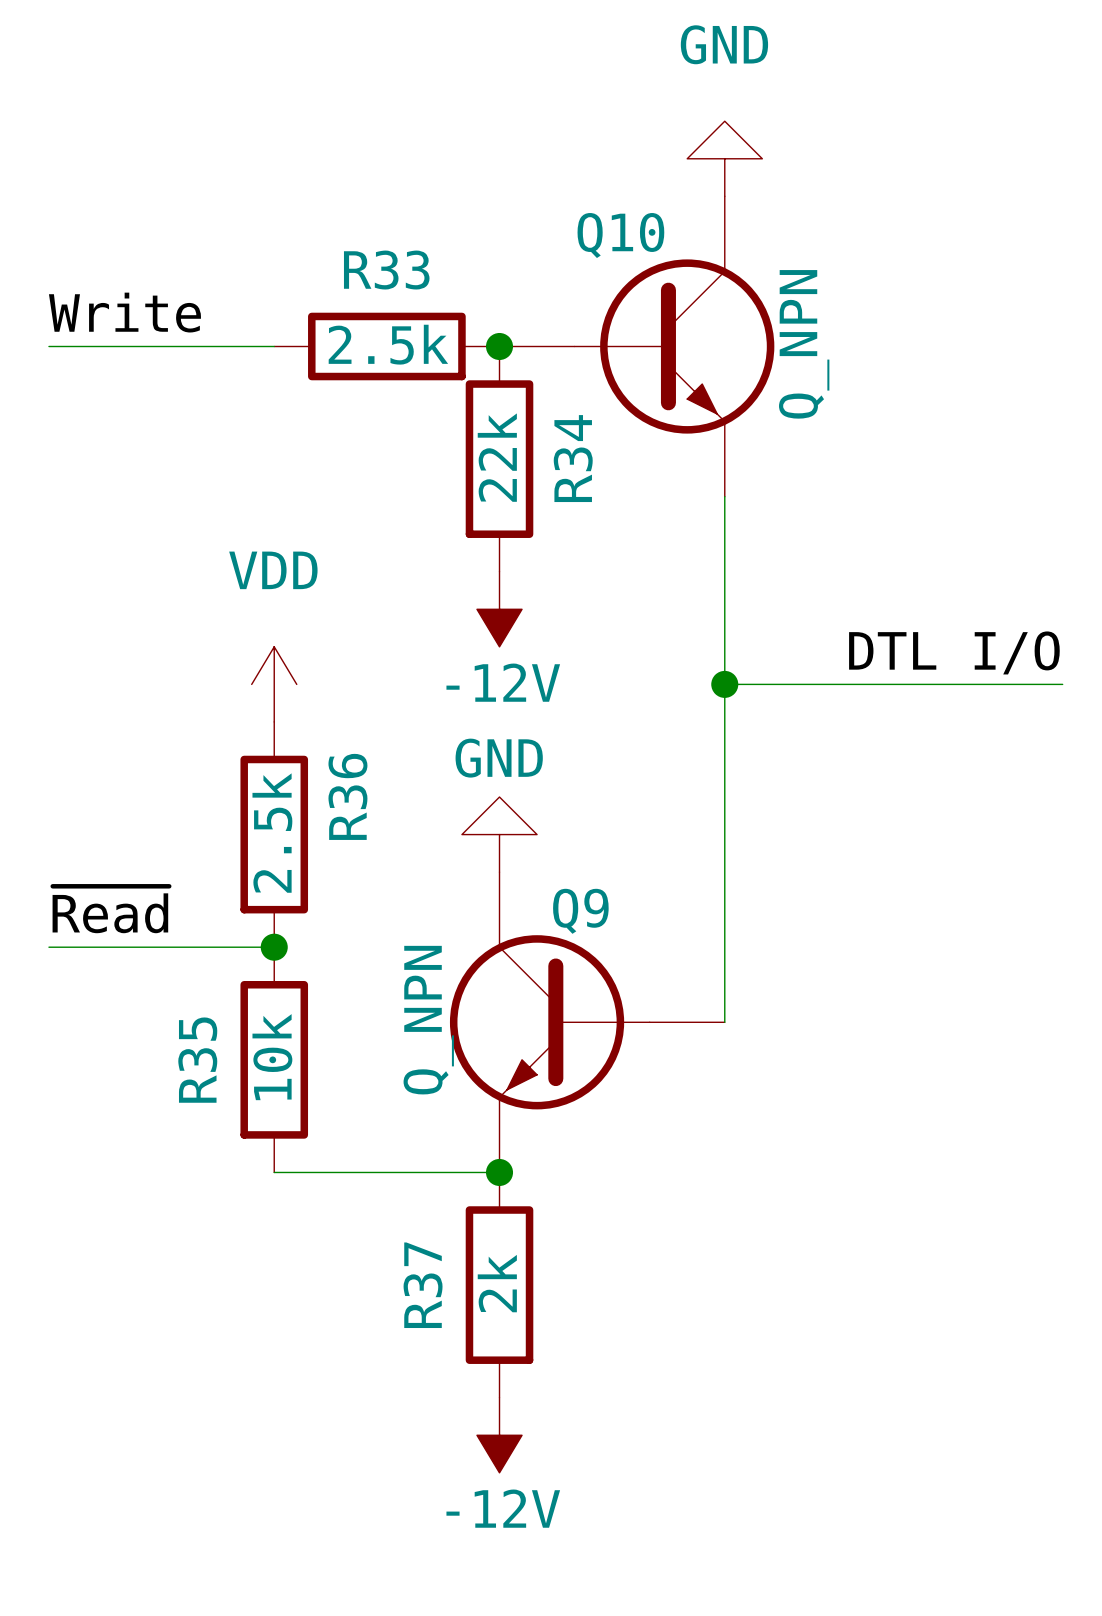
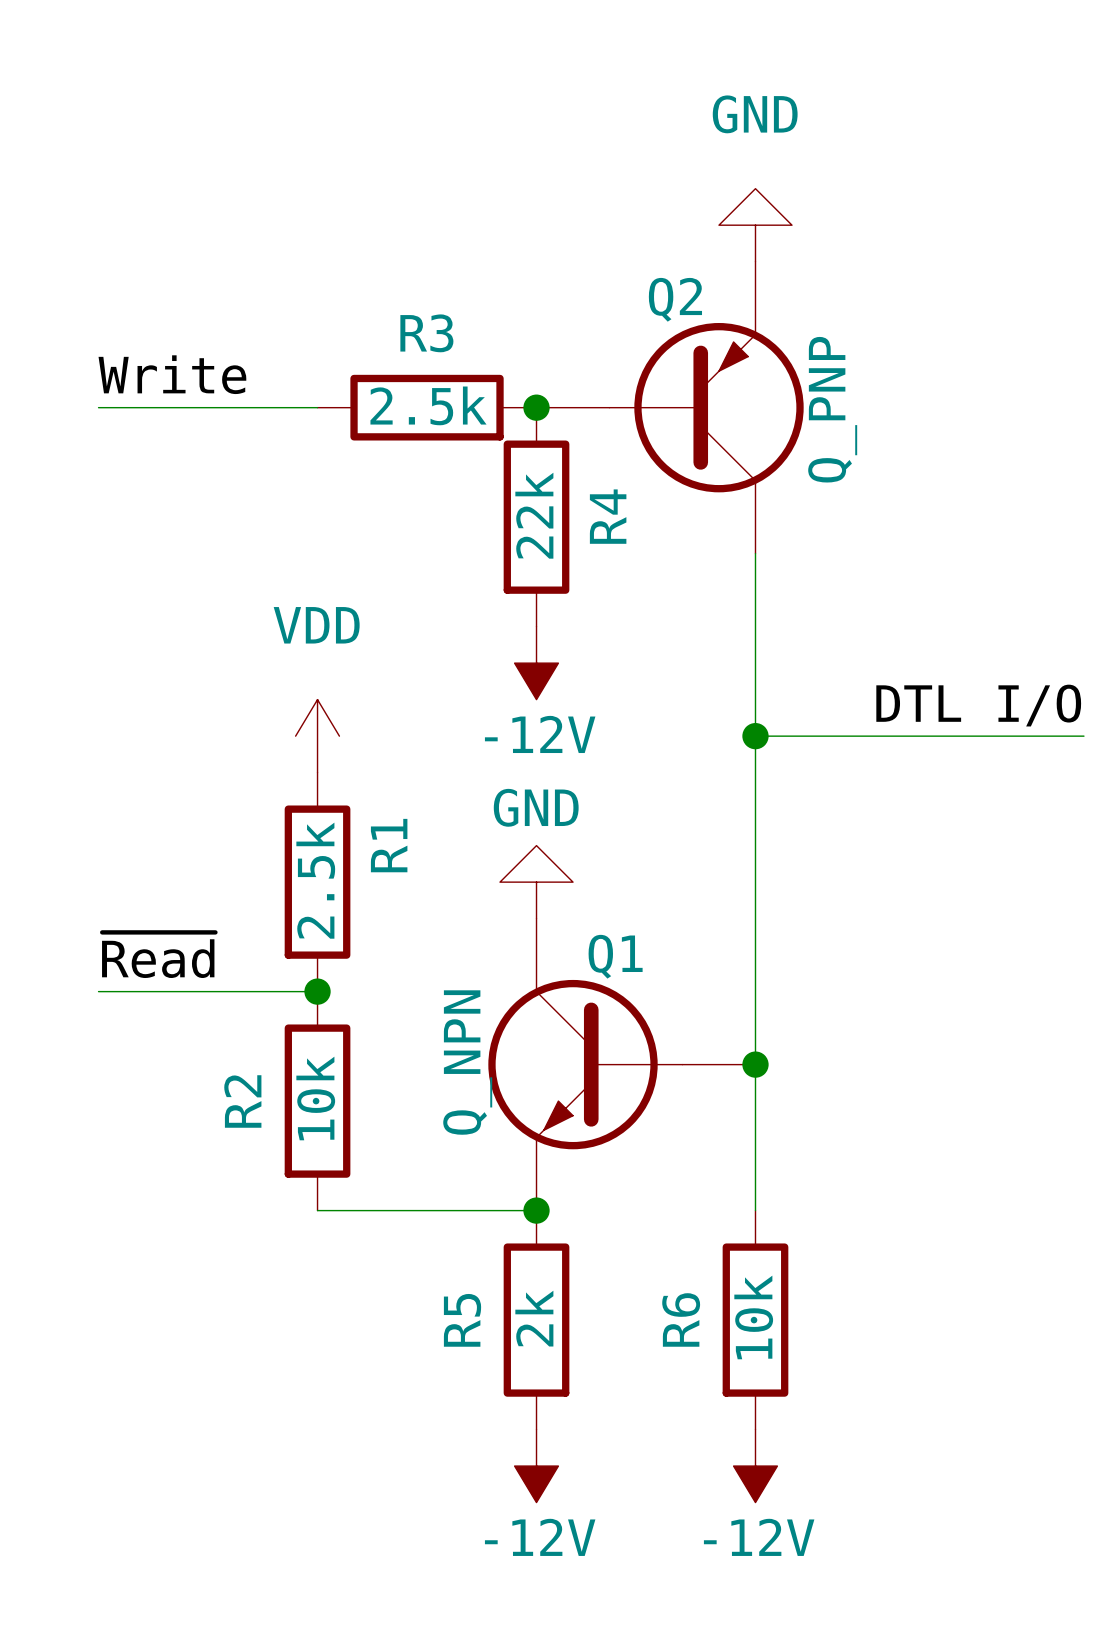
R33 name: R33 (386, 270) -> R3 (426, 333)
Q10: Q_NPN (636, 346) -> none
Q2: none -> Q_PNP (670, 407)
R34 name: R34 (573, 458) -> R4 (608, 516)
R36 name: R36 (347, 796) -> R1 (389, 845)
Q9 name: Q9 (580, 911) -> Q1 (615, 956)
wire: none -> (755, 1064) (755, 1210)
junction: none -> (755, 1064)
R35 name: R35 (197, 1060) -> R2 (242, 1101)
R37 name: R37 (423, 1285) -> R5 (462, 1320)
R6: none -> 10k (755, 1320)
power symbol: none -> -12V (755, 1466)

